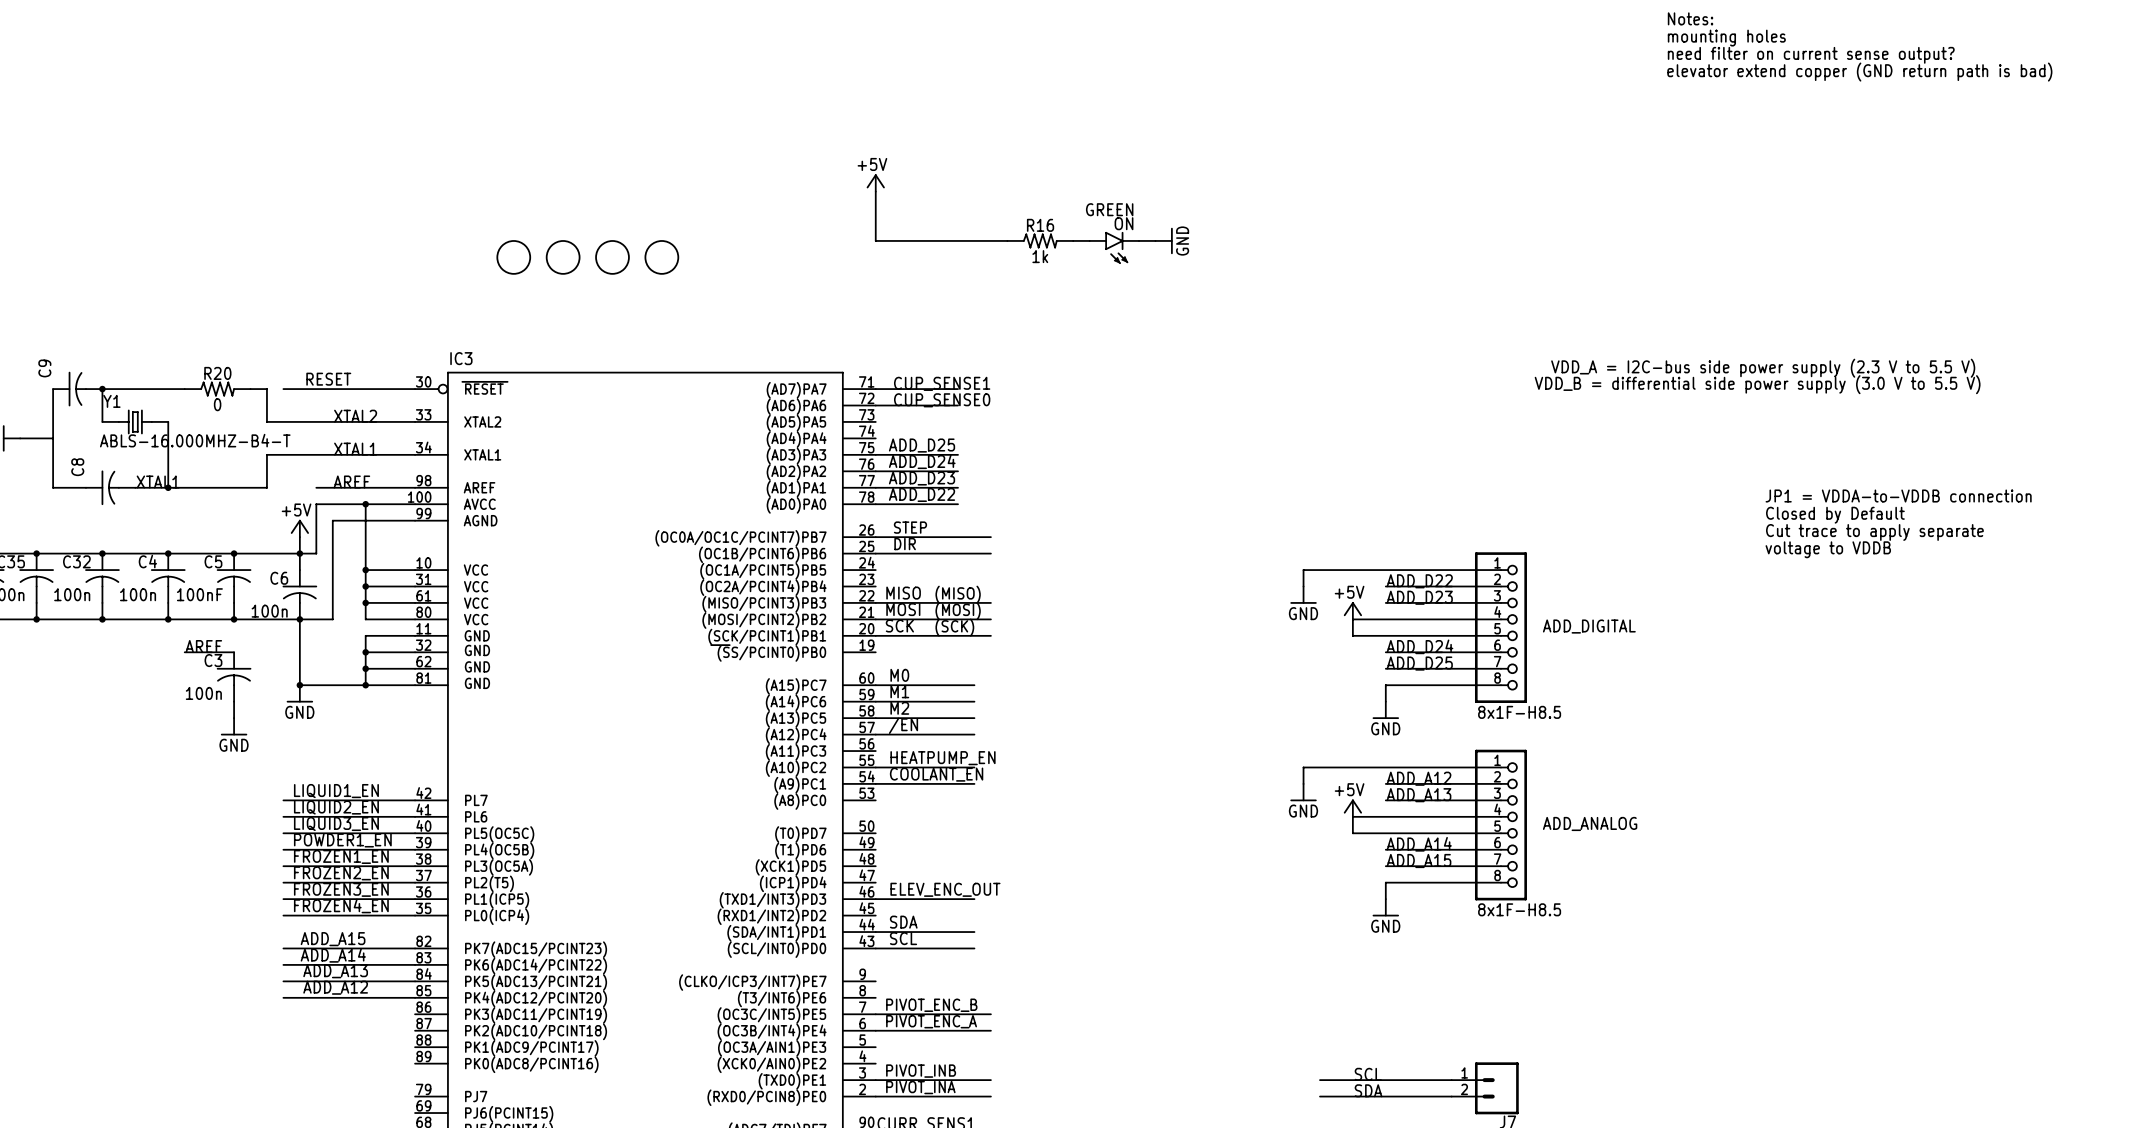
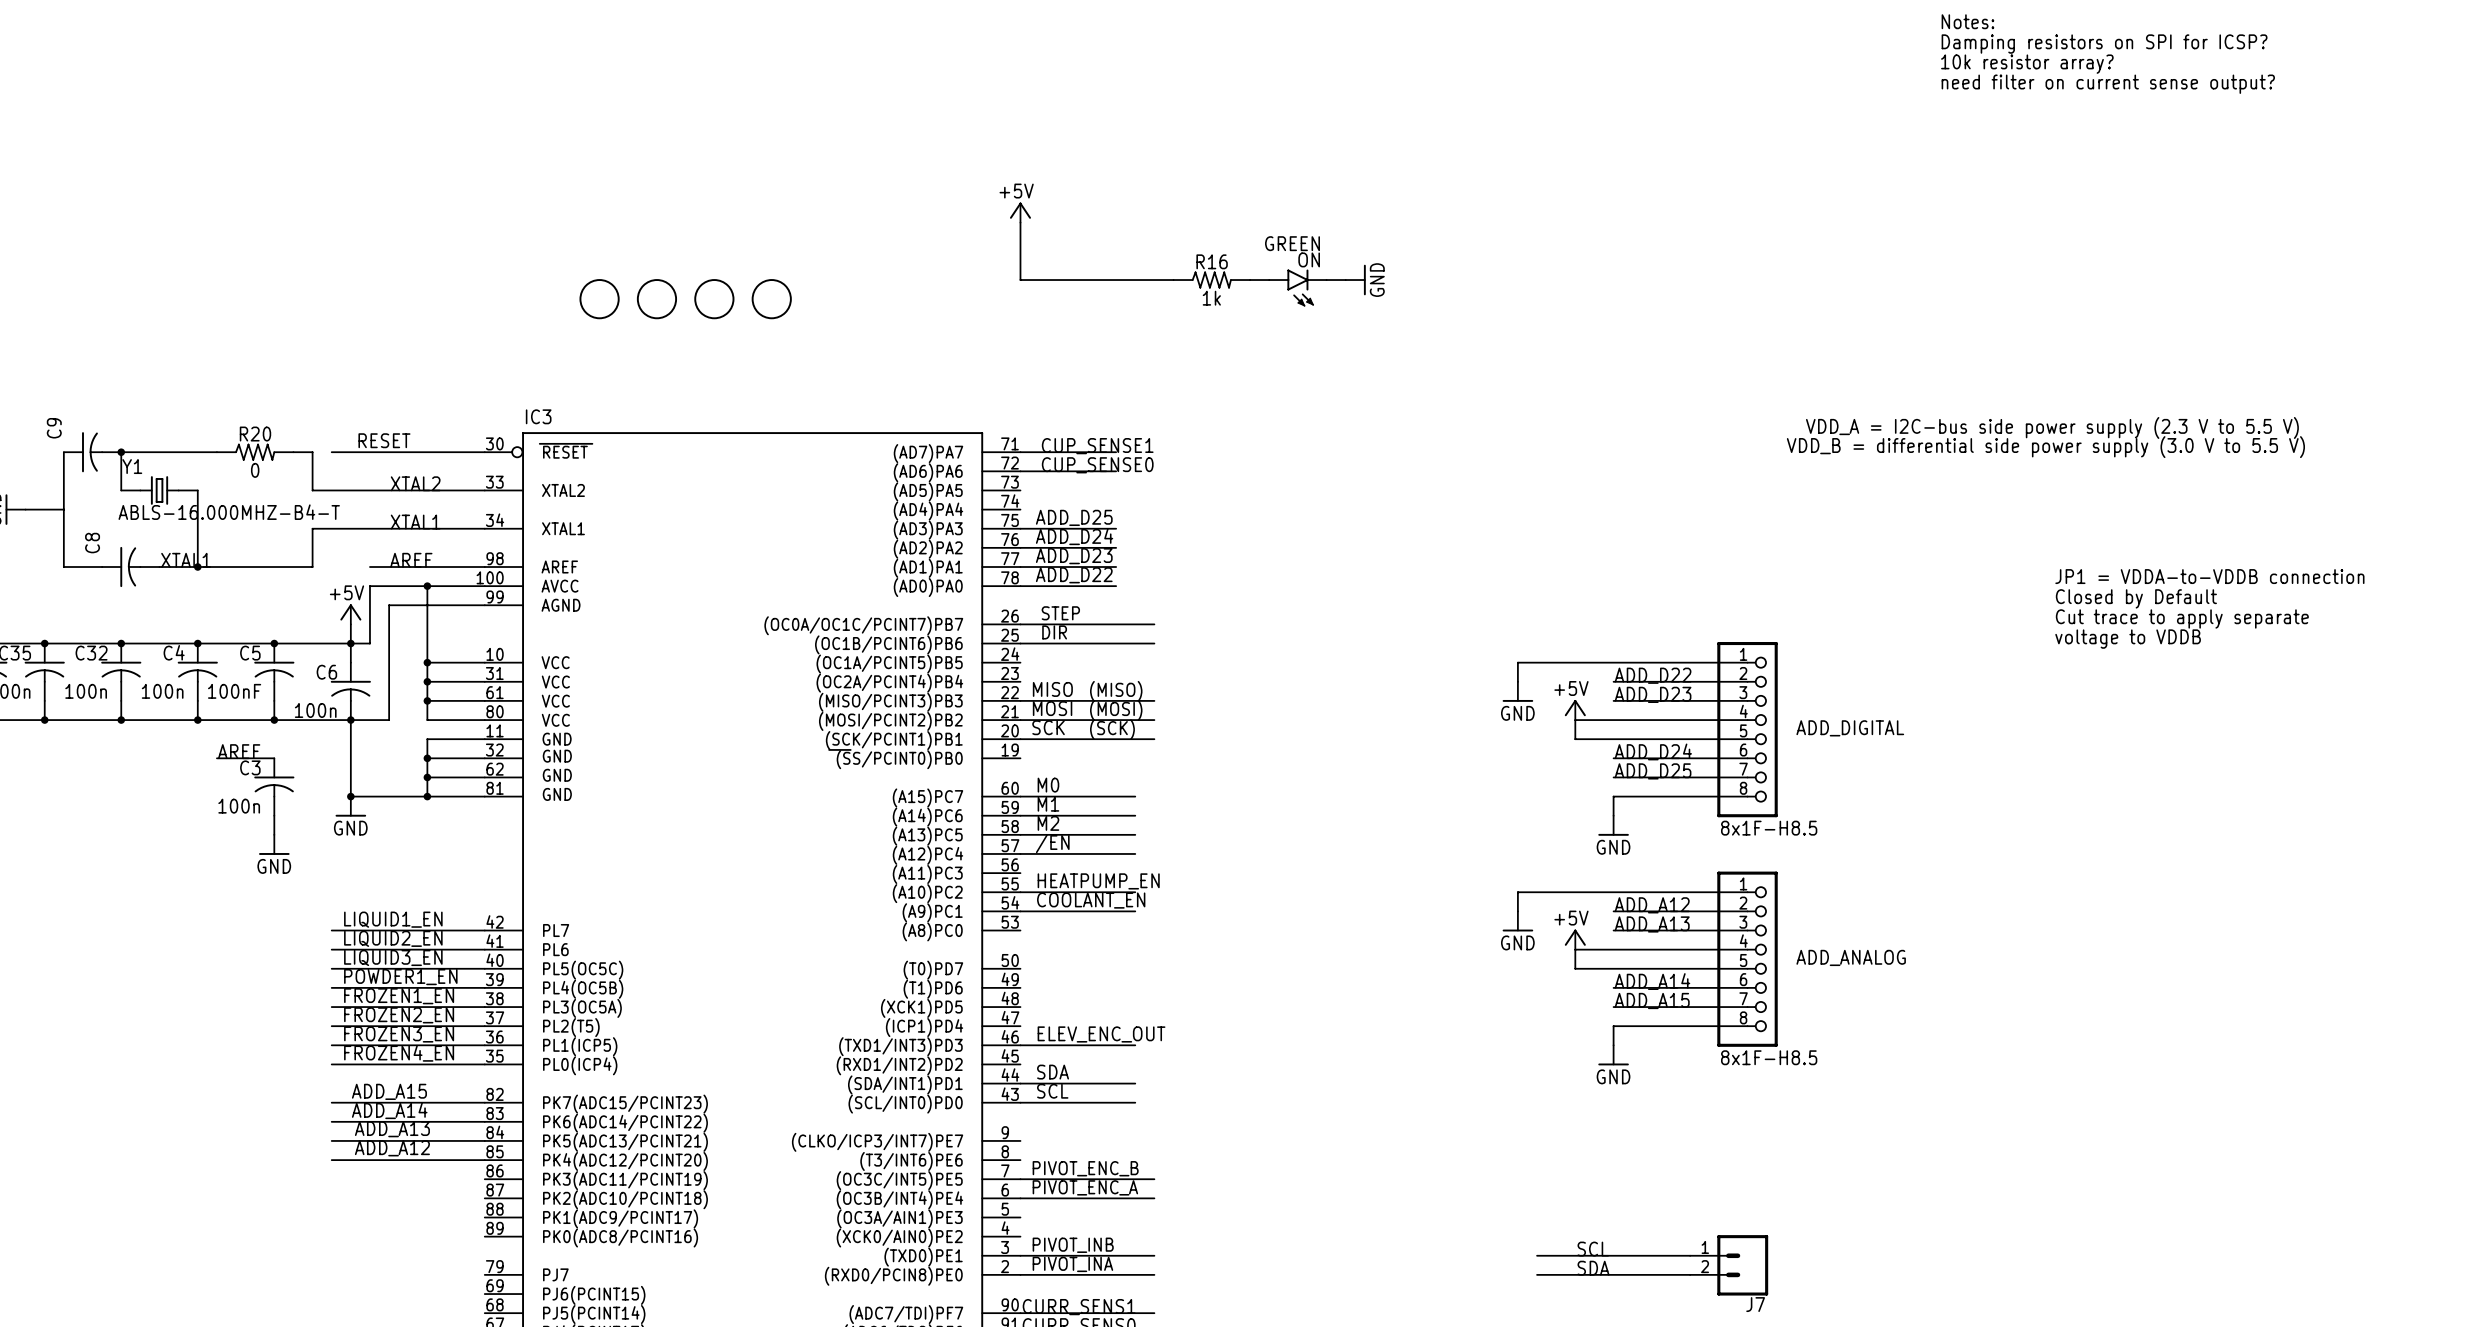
text: mounting holes (1726, 38) -> Damping resistors on SPI for ICSP? (2104, 44)
text: need filter on current sense output? (1811, 55) -> 10k resistor array? (2027, 64)
text: elevator extend copper (GND return path is bad) (1859, 72) -> need filter on current sense output? (2108, 84)

